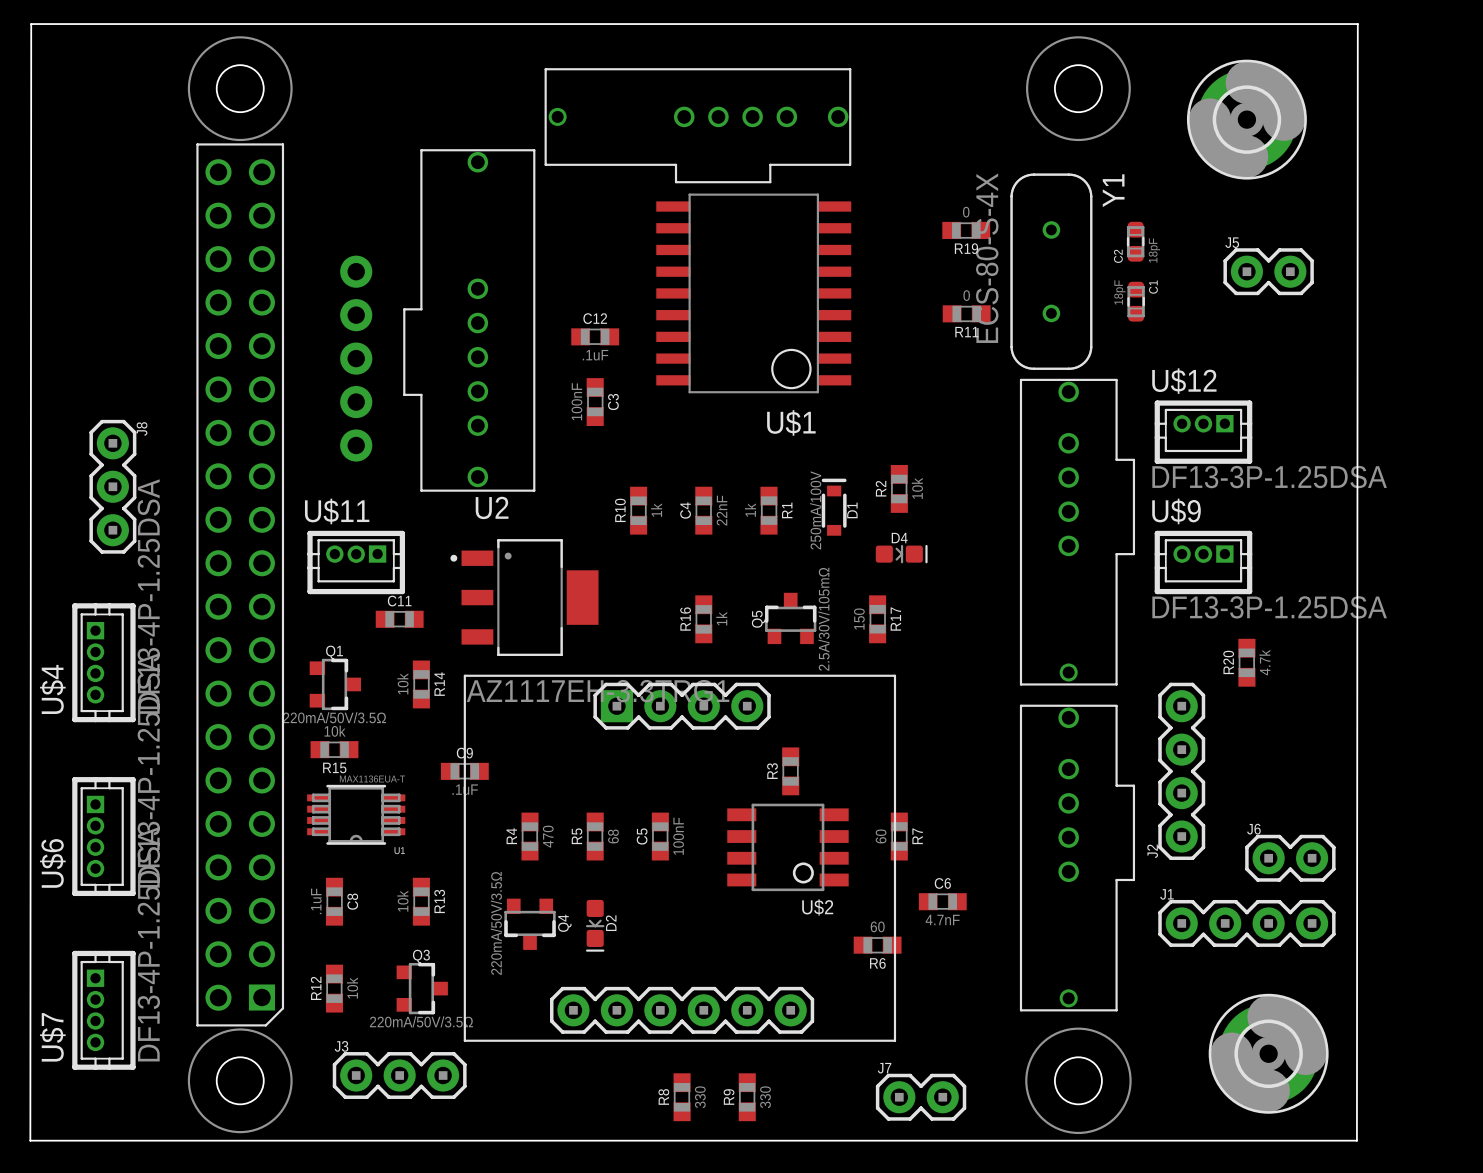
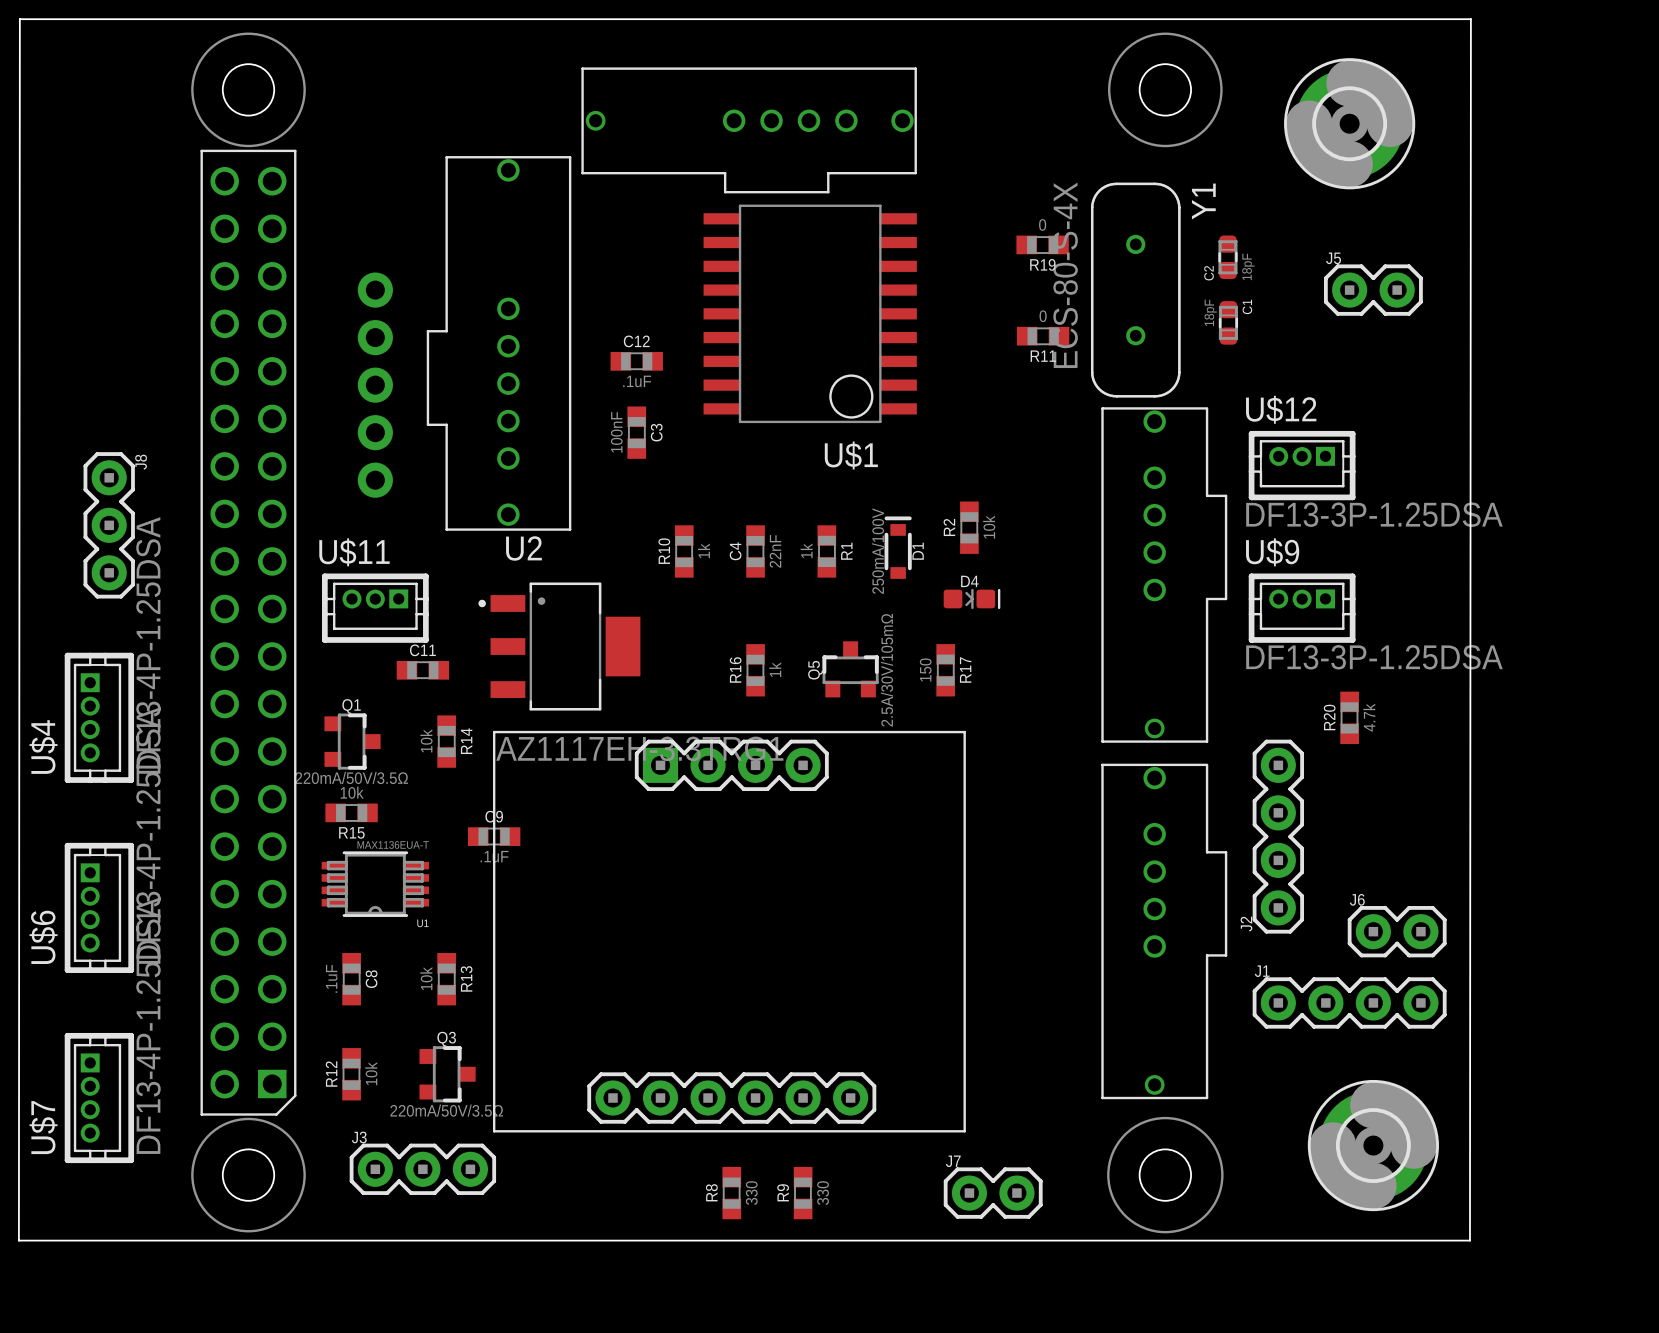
R3: (790, 771) -> none
R4: 470 (530, 836) -> none
R5: 68 (595, 836) -> none
C5: 100nF (660, 836) -> none
R7: 60 (899, 836) -> none
U$2: (787, 847) -> none
C6: 4.7nF (942, 901) -> none
Q4: 220mA/50V/3.5Ω (530, 924) -> none
D2: (595, 925) -> none
R6: 60 (877, 945) -> none

